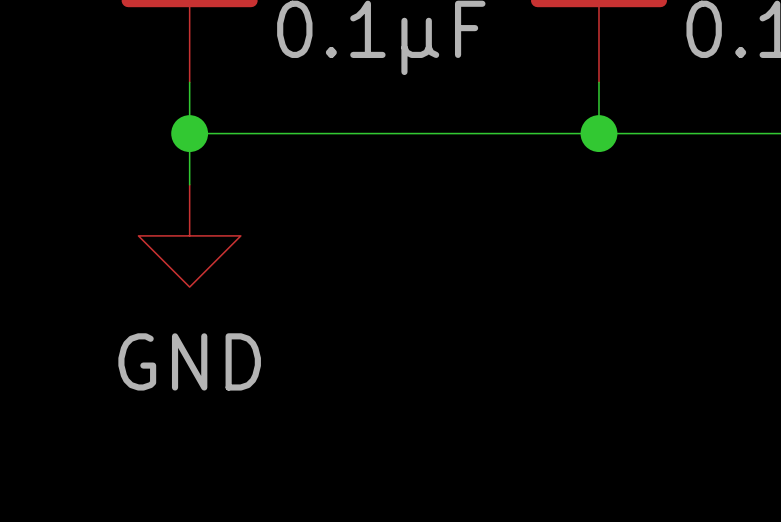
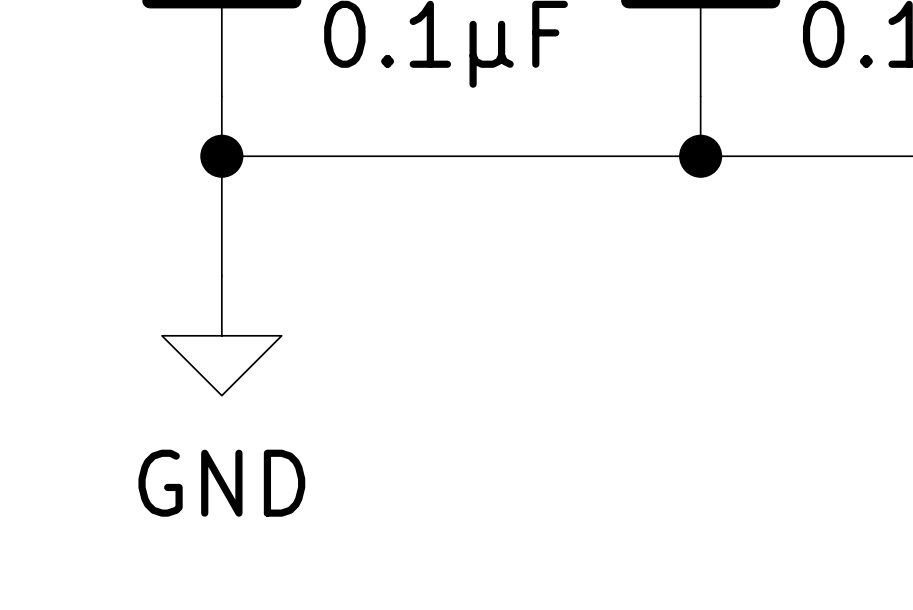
power symbol position: GND (189, 235) -> GND (221, 335)

